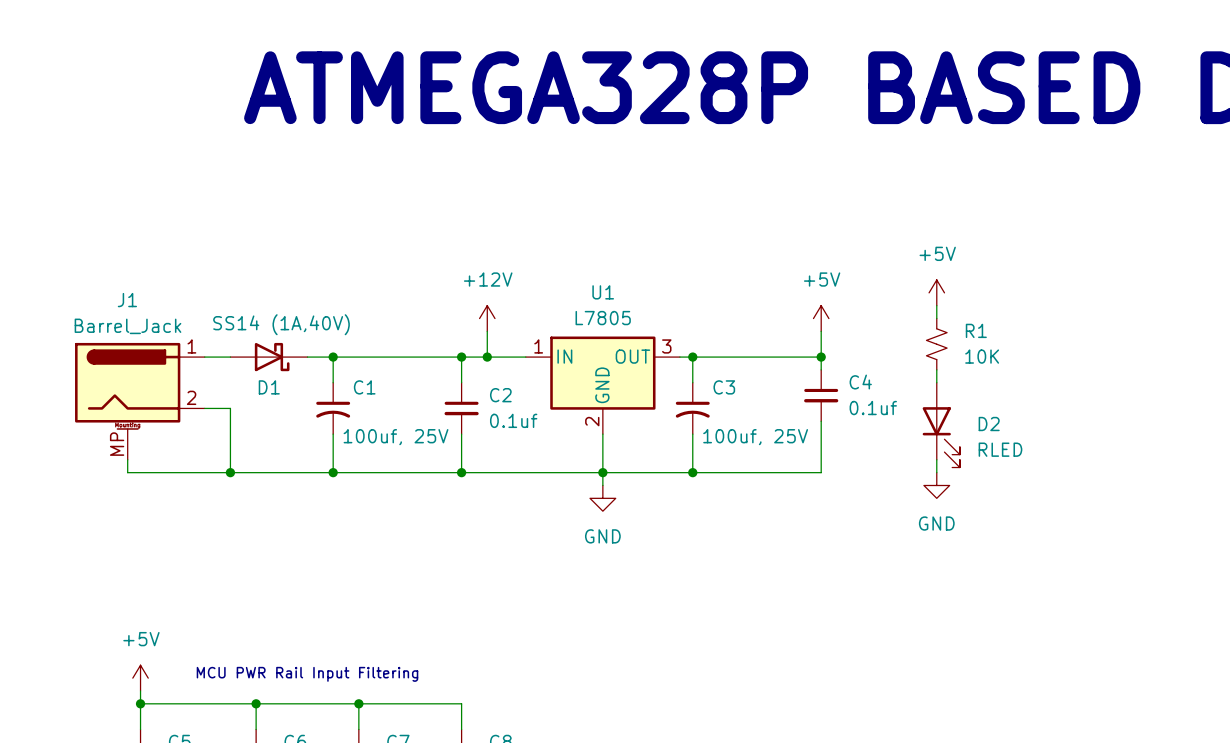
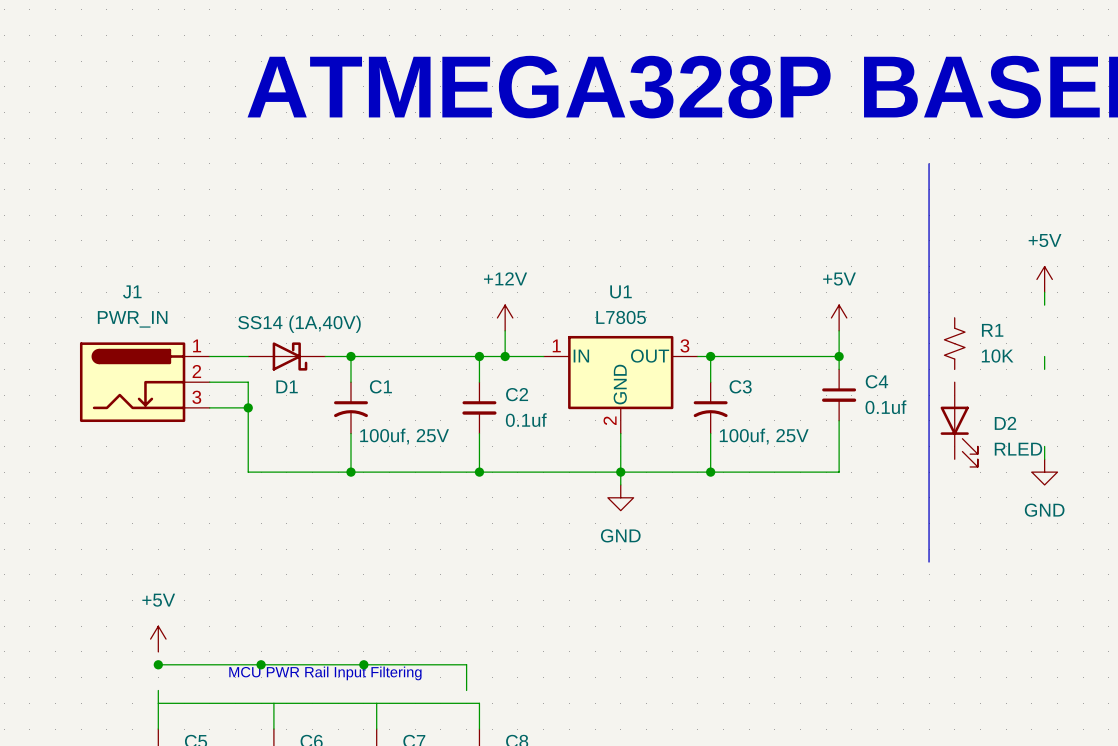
line: none -> (929, 163) (929, 562)
power symbol position: +5V (936, 292) -> +5V (1044, 279)
wire: (936, 305) (936, 318) -> (1044, 292) (1044, 305)
J1 value: Barrel_Jack (128, 326) -> PWR_IN (132, 319)
J1 symbol: [75, 342, 205, 460] -> [79, 342, 210, 423]
wire: (936, 369) (936, 382) -> (1044, 356) (1044, 369)
wire: none -> (209, 382) (248, 382) (248, 407)
junction: none -> (248, 407)
wire: (127, 459) (127, 472) (230, 472) -> none
wire: (936, 459) (936, 472) -> (1044, 446) (1044, 459)
junction: (230, 472) -> none
power symbol position: GND (936, 485) -> GND (1044, 472)
wire: none -> (158, 664) (466, 664) (466, 690)
junction: none -> (261, 664)
junction: none -> (363, 664)
power symbol position: +5V (140, 678) -> +5V (158, 639)
junction position: (140, 703) -> (158, 664)
junction: (256, 703) -> none
junction: (358, 703) -> none

